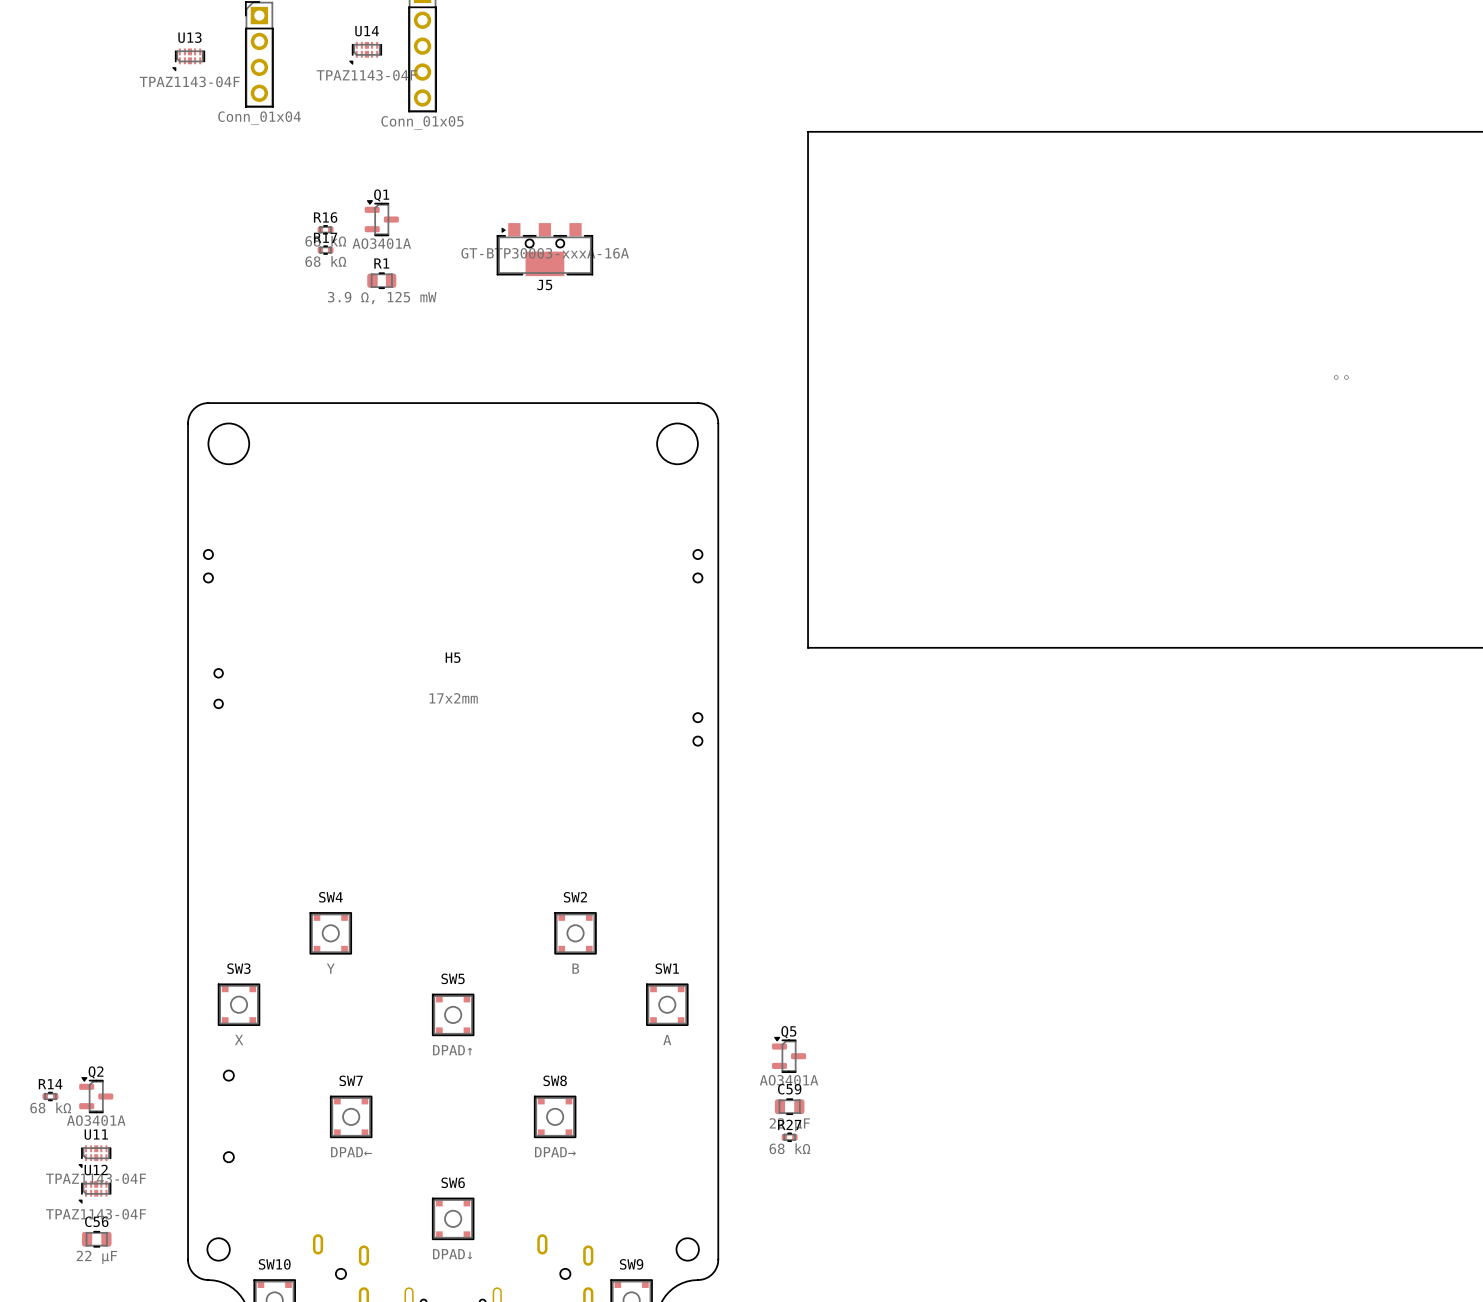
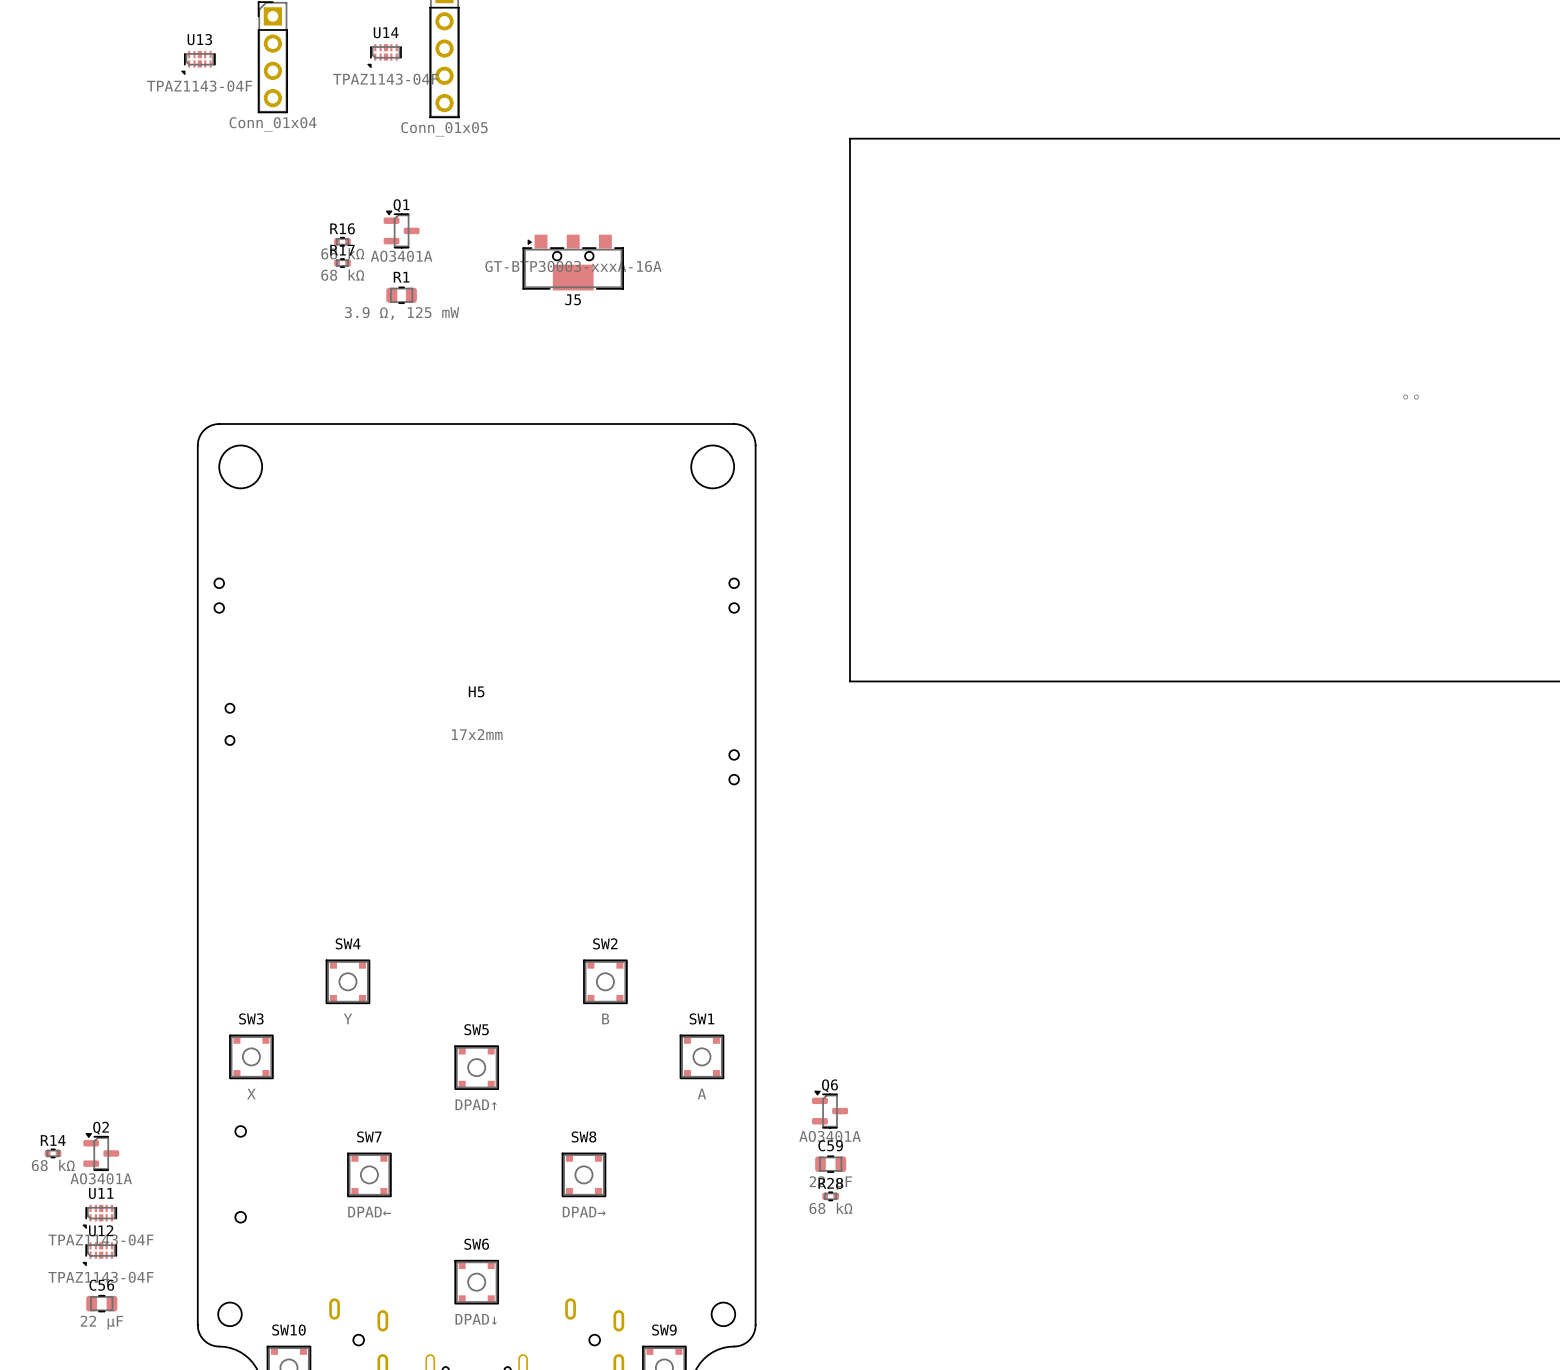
Q5 name: Q5 (788, 1032) -> Q6 (829, 1085)
R27 name: R27 (789, 1124) -> R28 (830, 1183)

